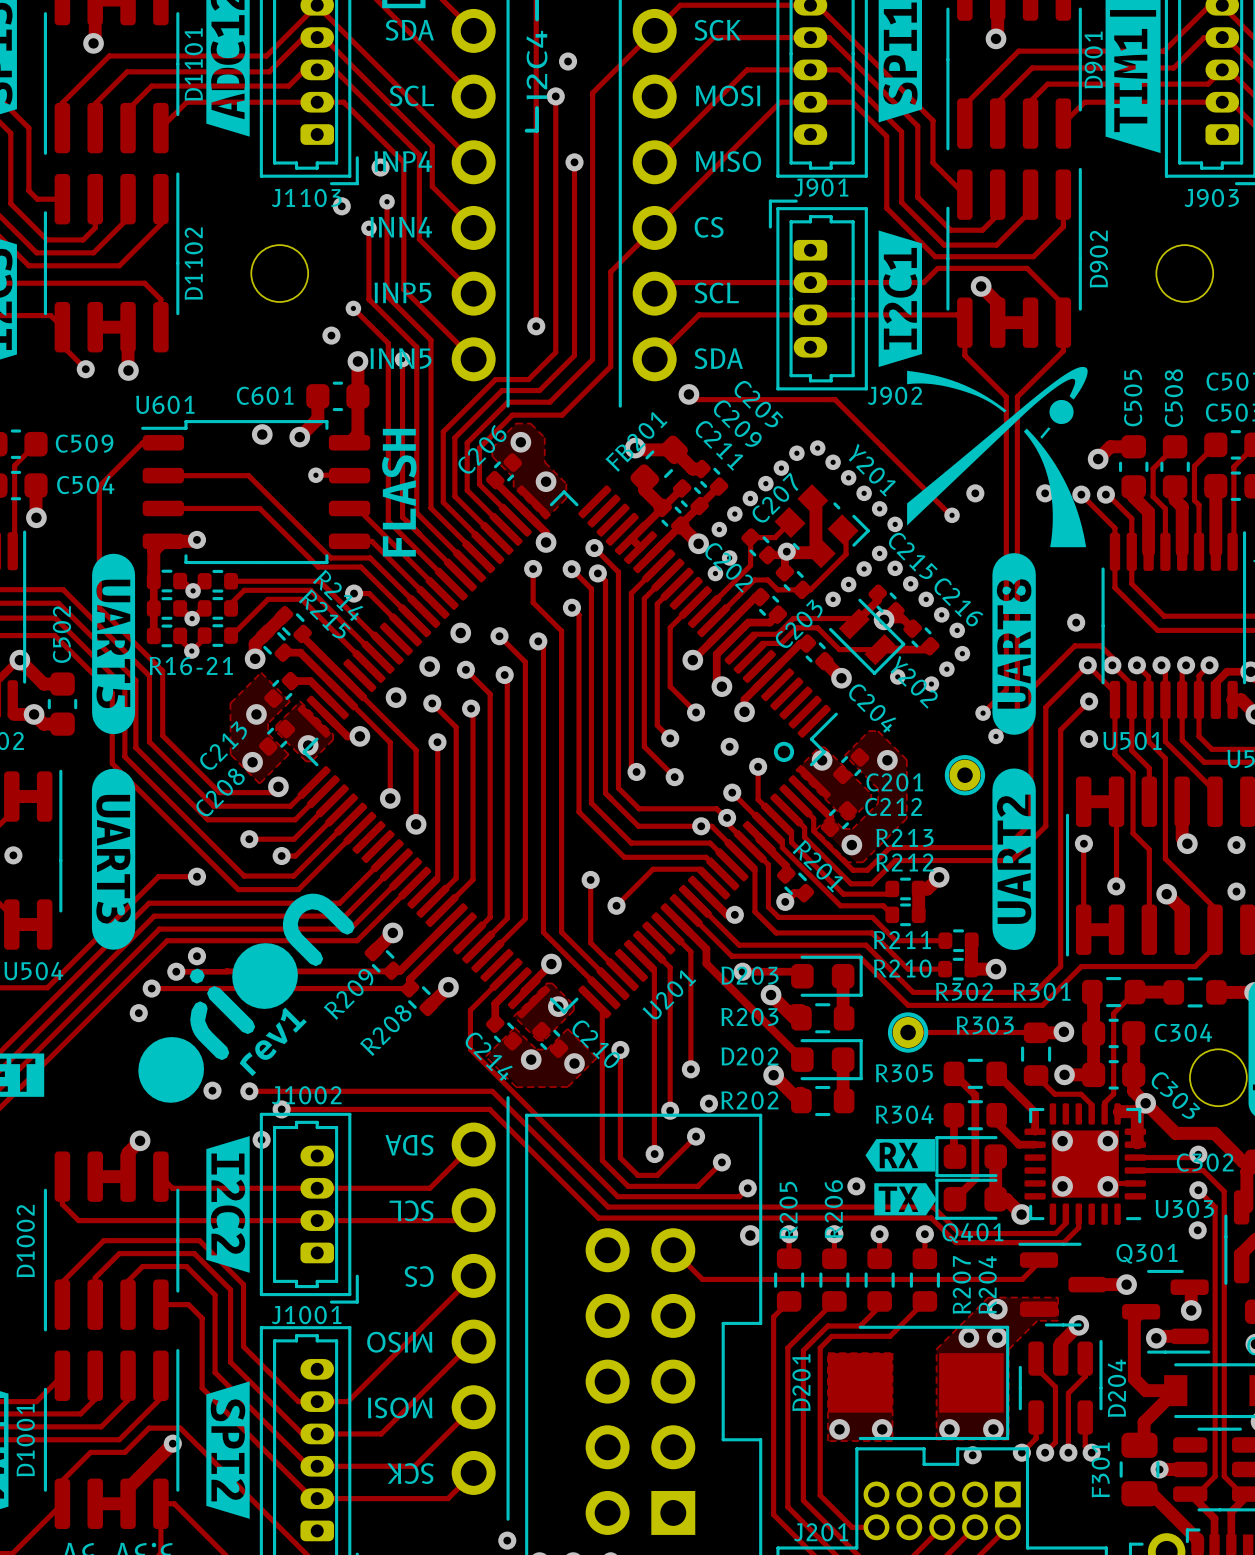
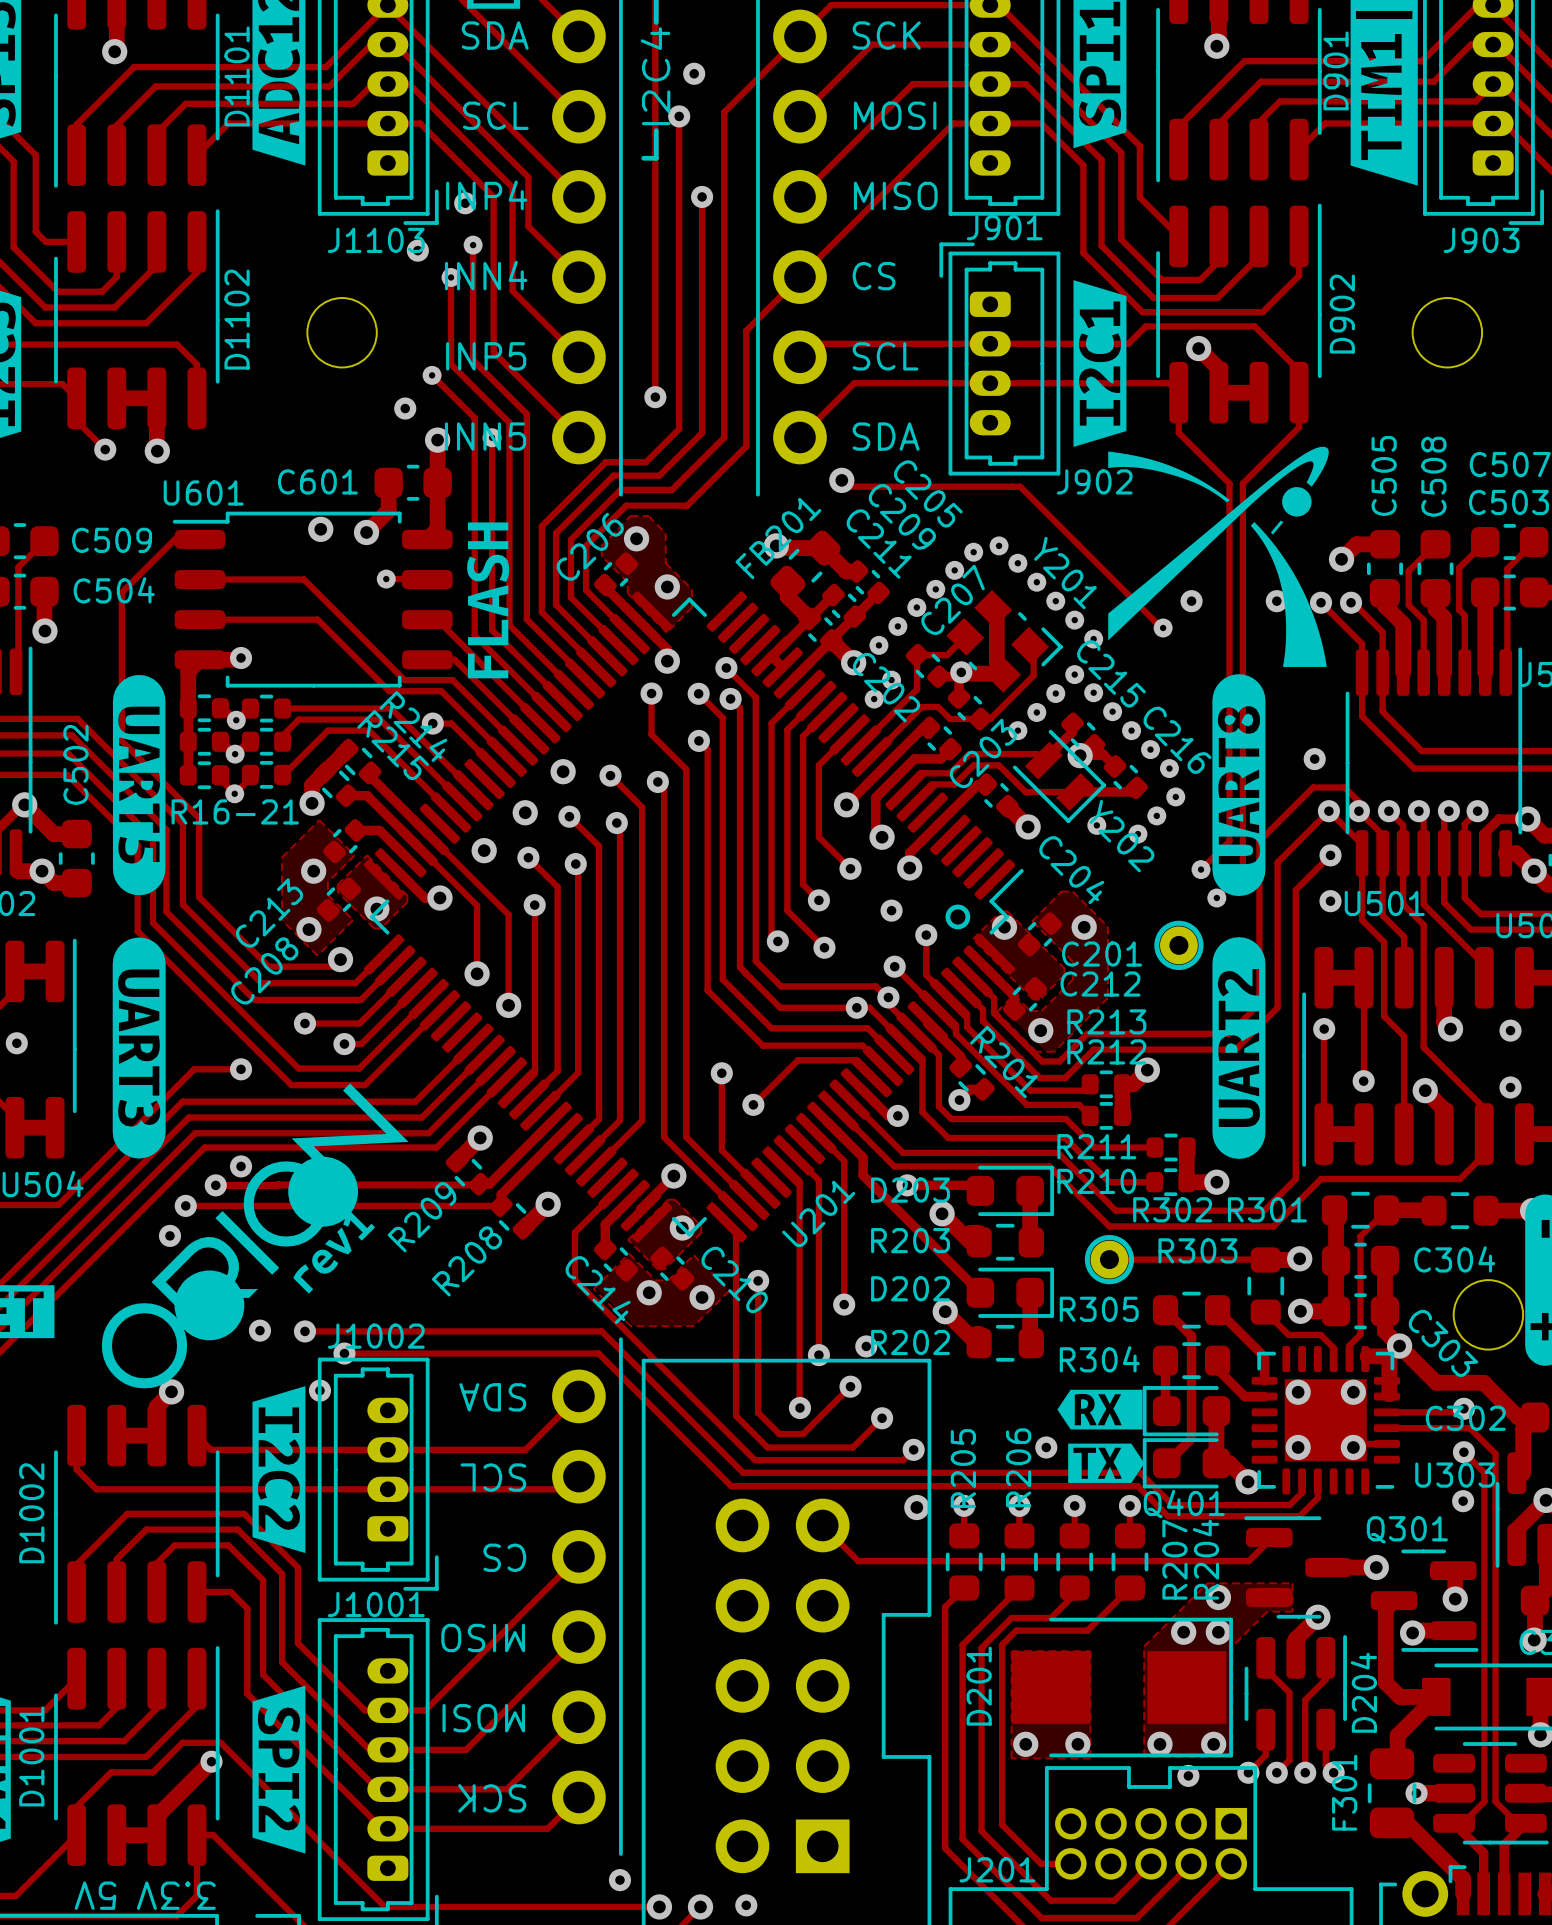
drawing: none -> [101, 1083, 409, 1389]
drawing: [138, 893, 355, 1103] -> none
drawing position: (273, 1041) -> (334, 1251)

